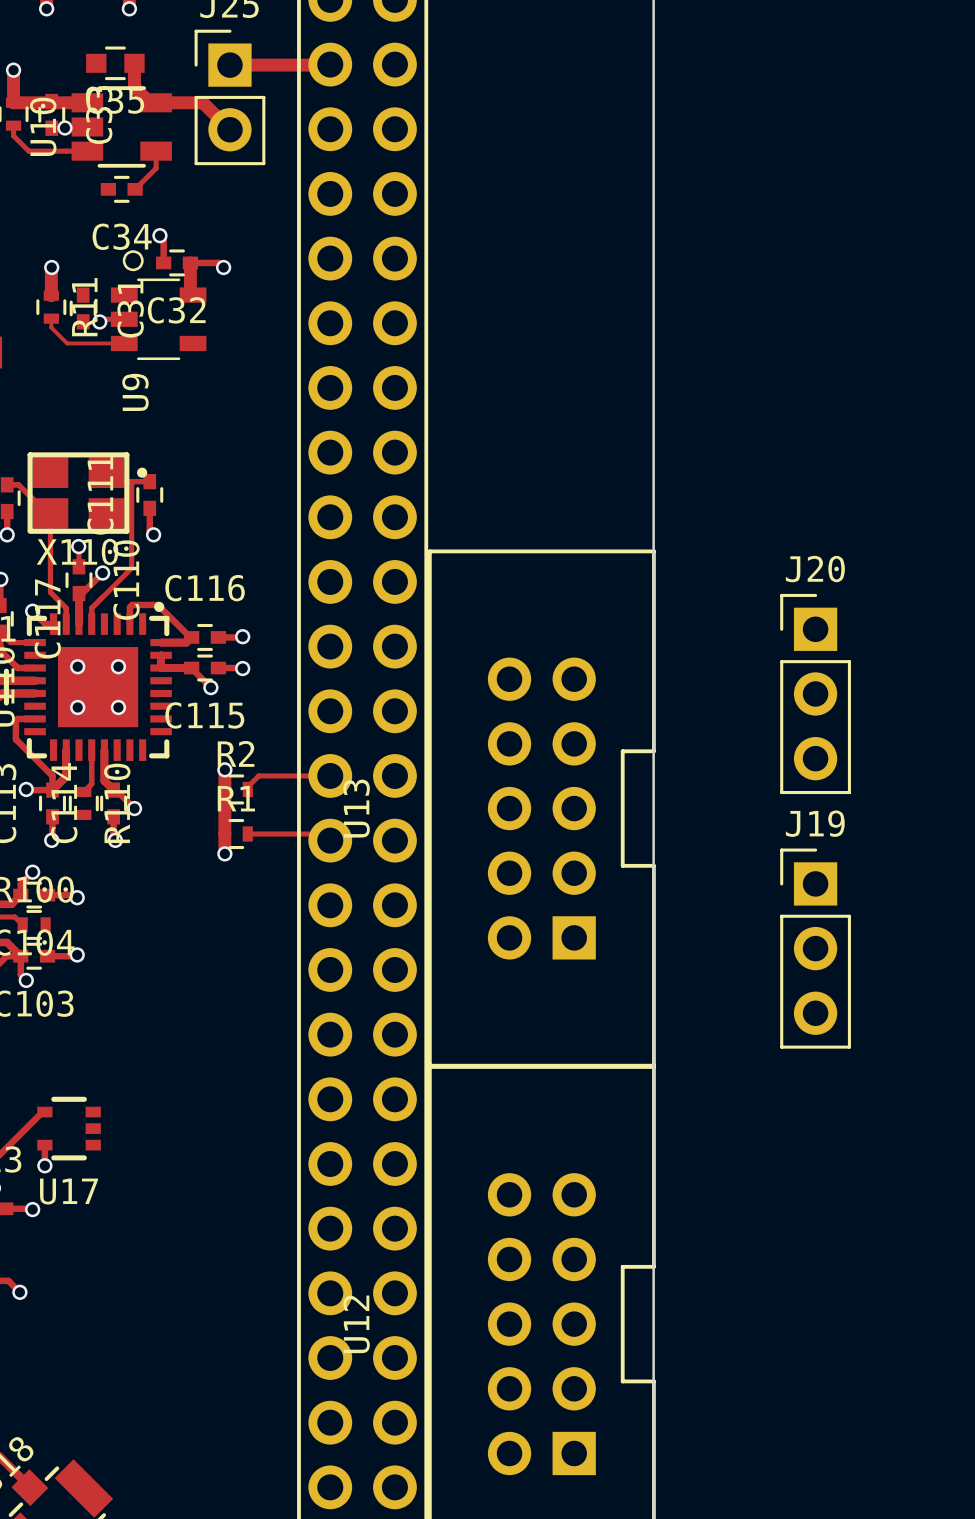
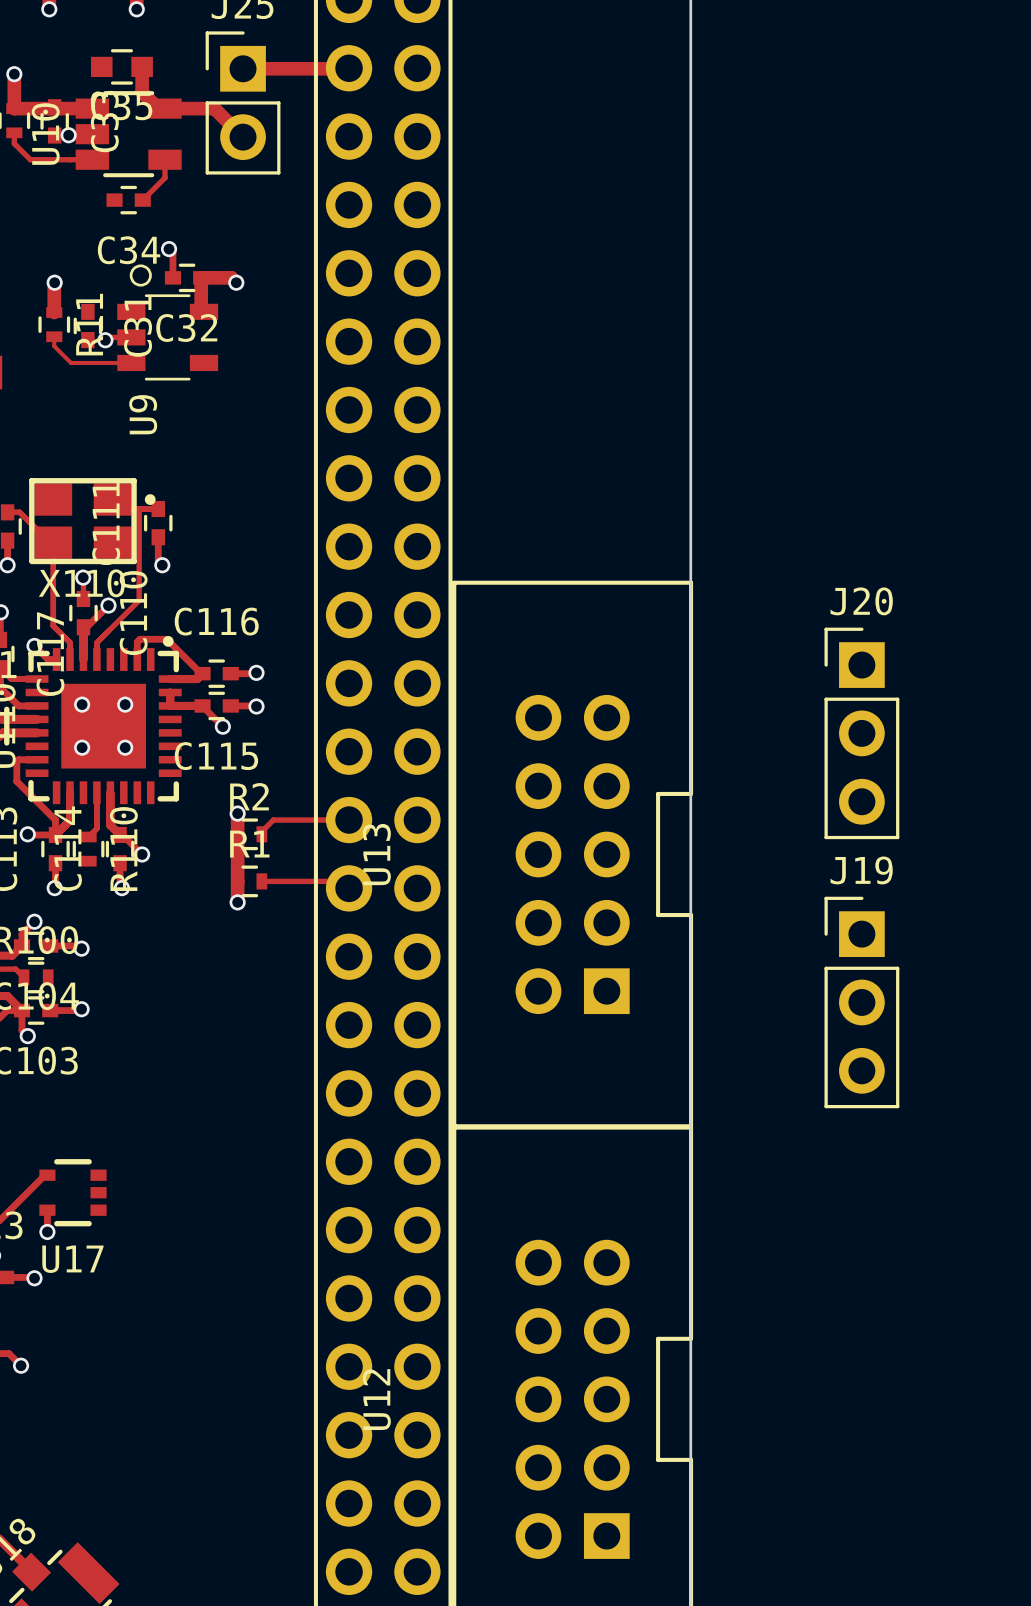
track width: thin (190, 262) (219, 262) (223, 267) -> thick (201, 277) (231, 277) (236, 282)

